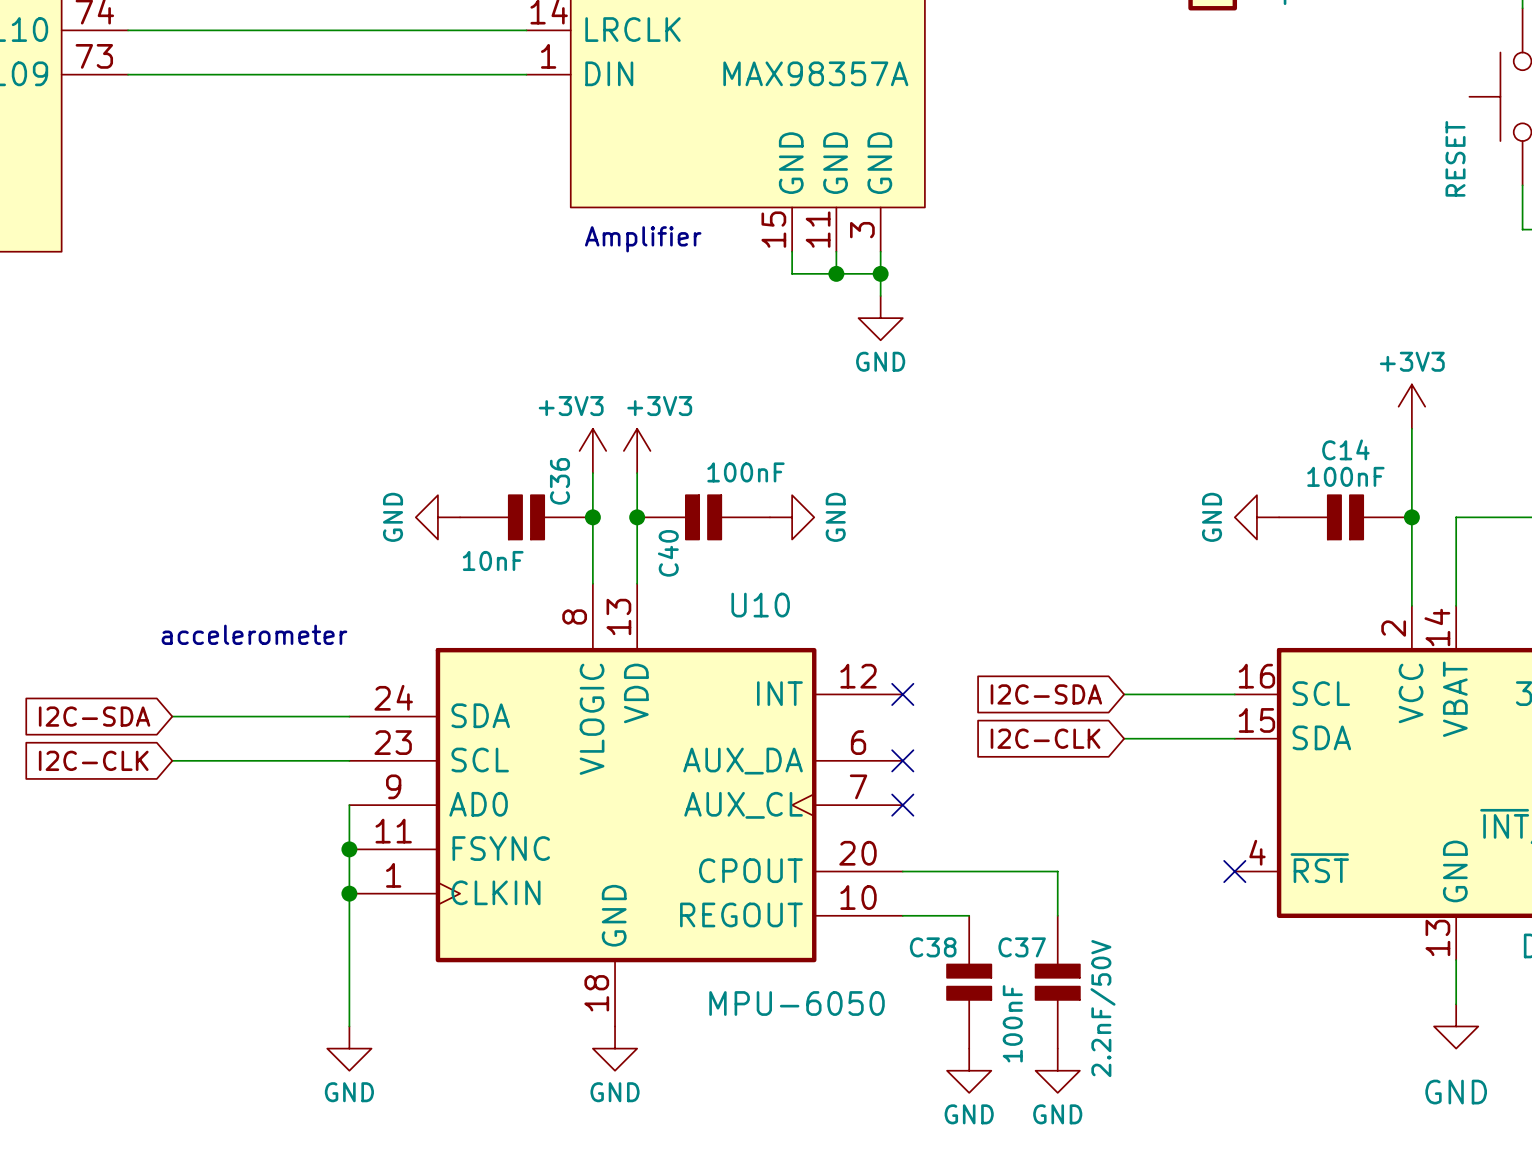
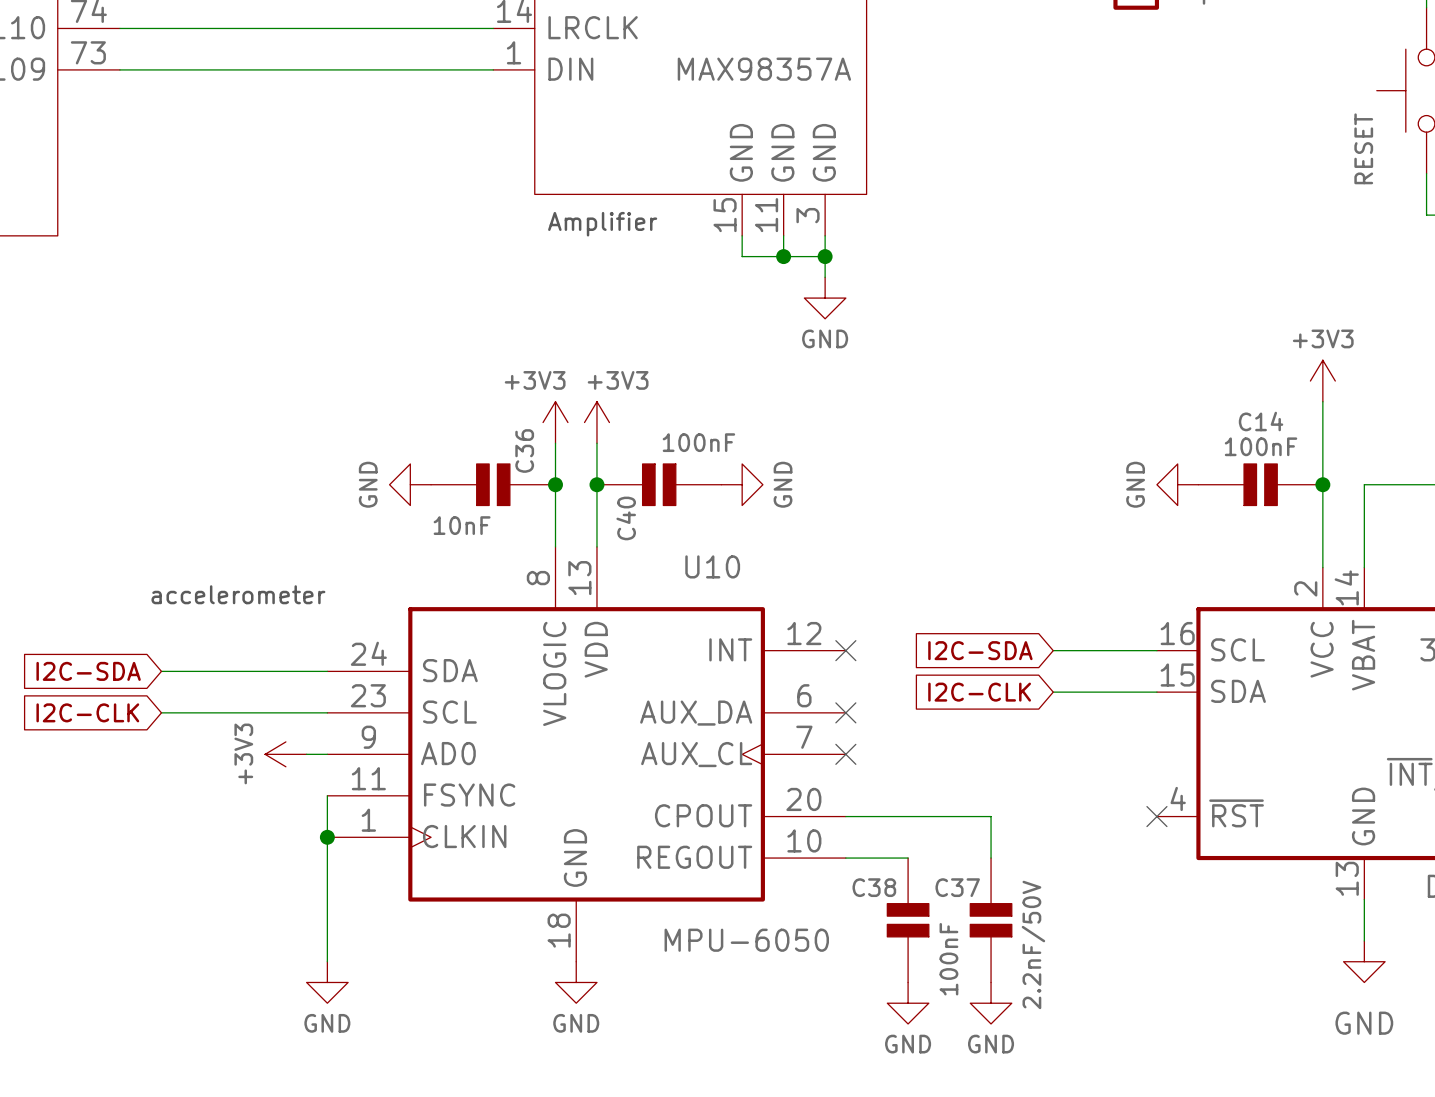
power symbol: none -> +3V3 (285, 754)
wire: (349, 805) (349, 849) -> (327, 754) (306, 754)
junction: (349, 849) -> none

